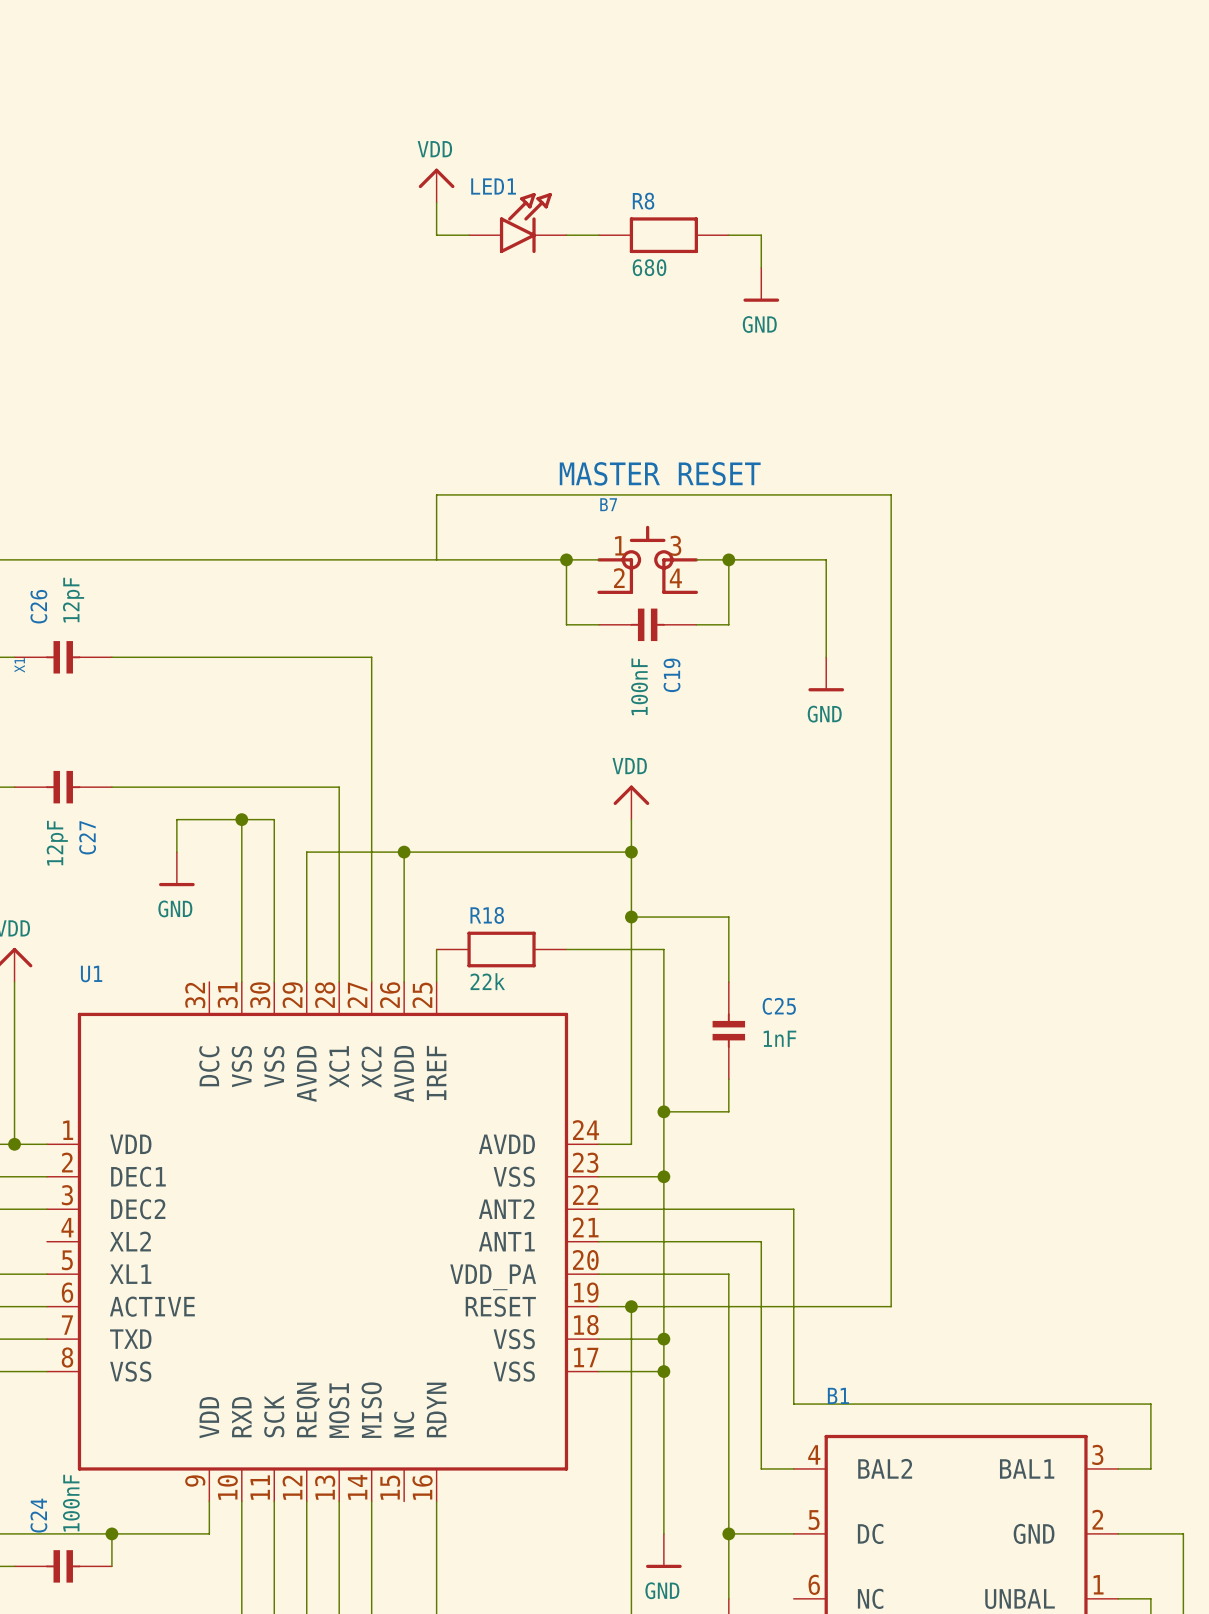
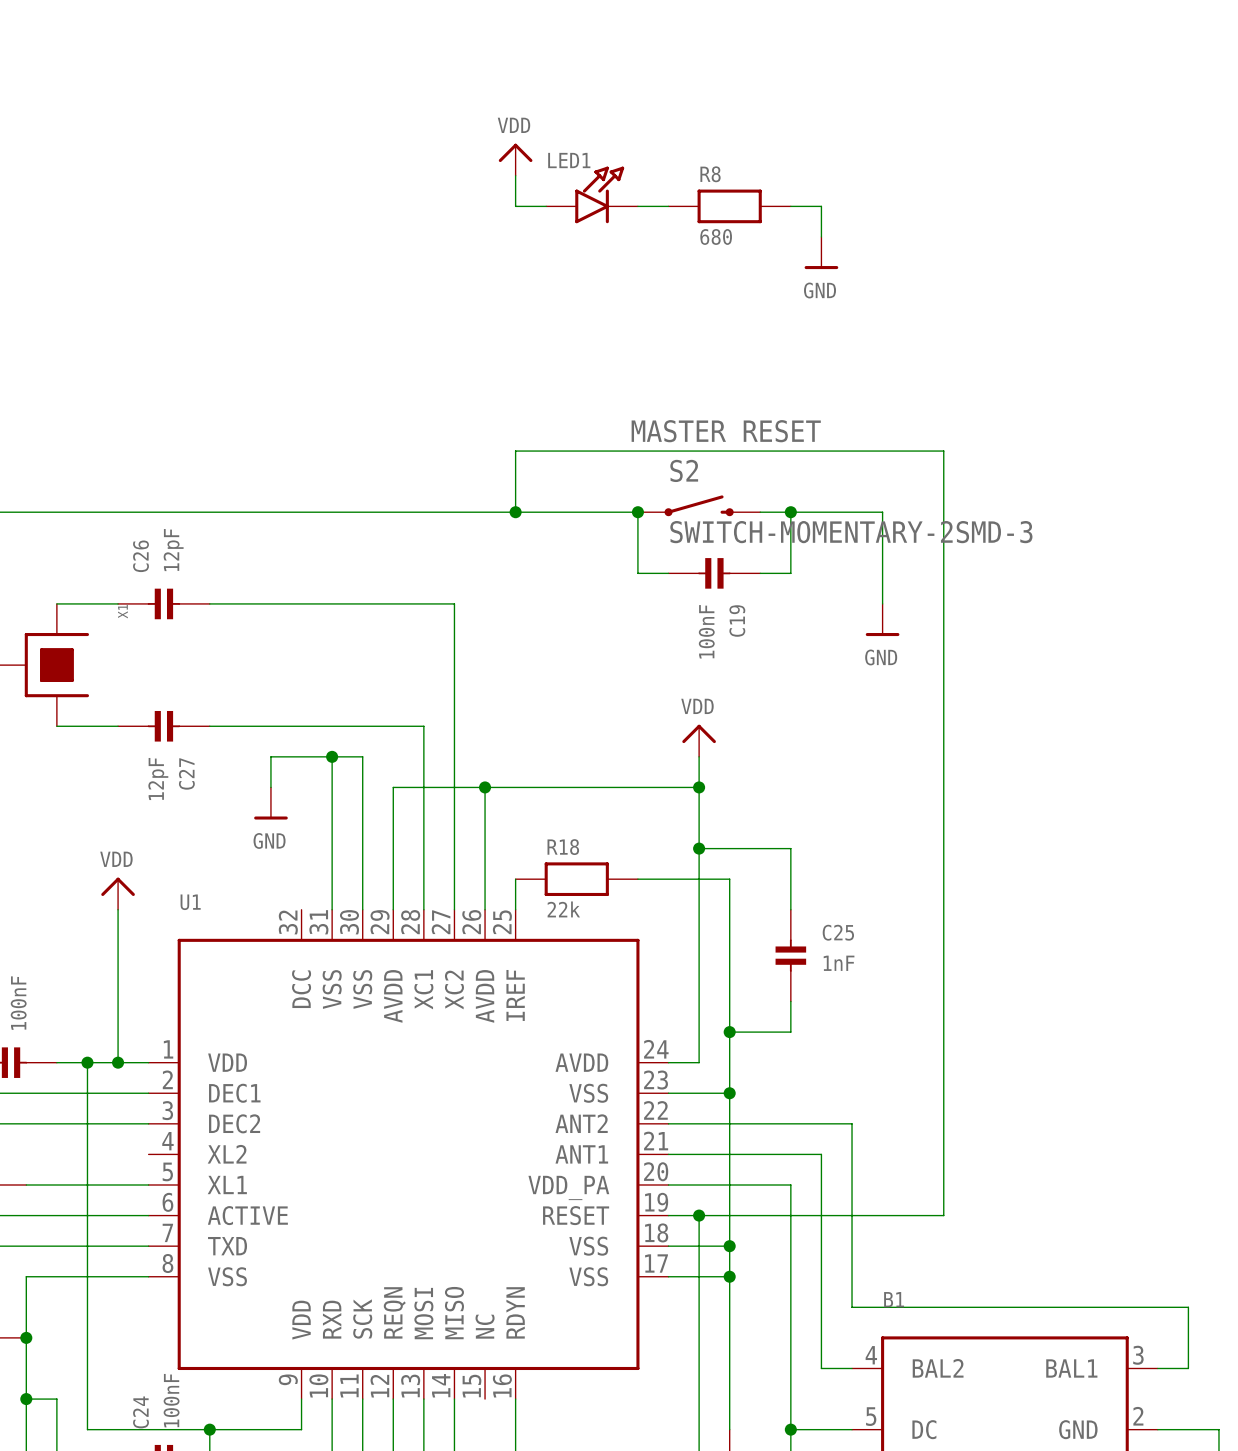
S2: none -> SWITCH-MOMENTARY-2SMD-3 (699, 505)
junction: none -> (515, 512)
B7: (647, 559) -> none

